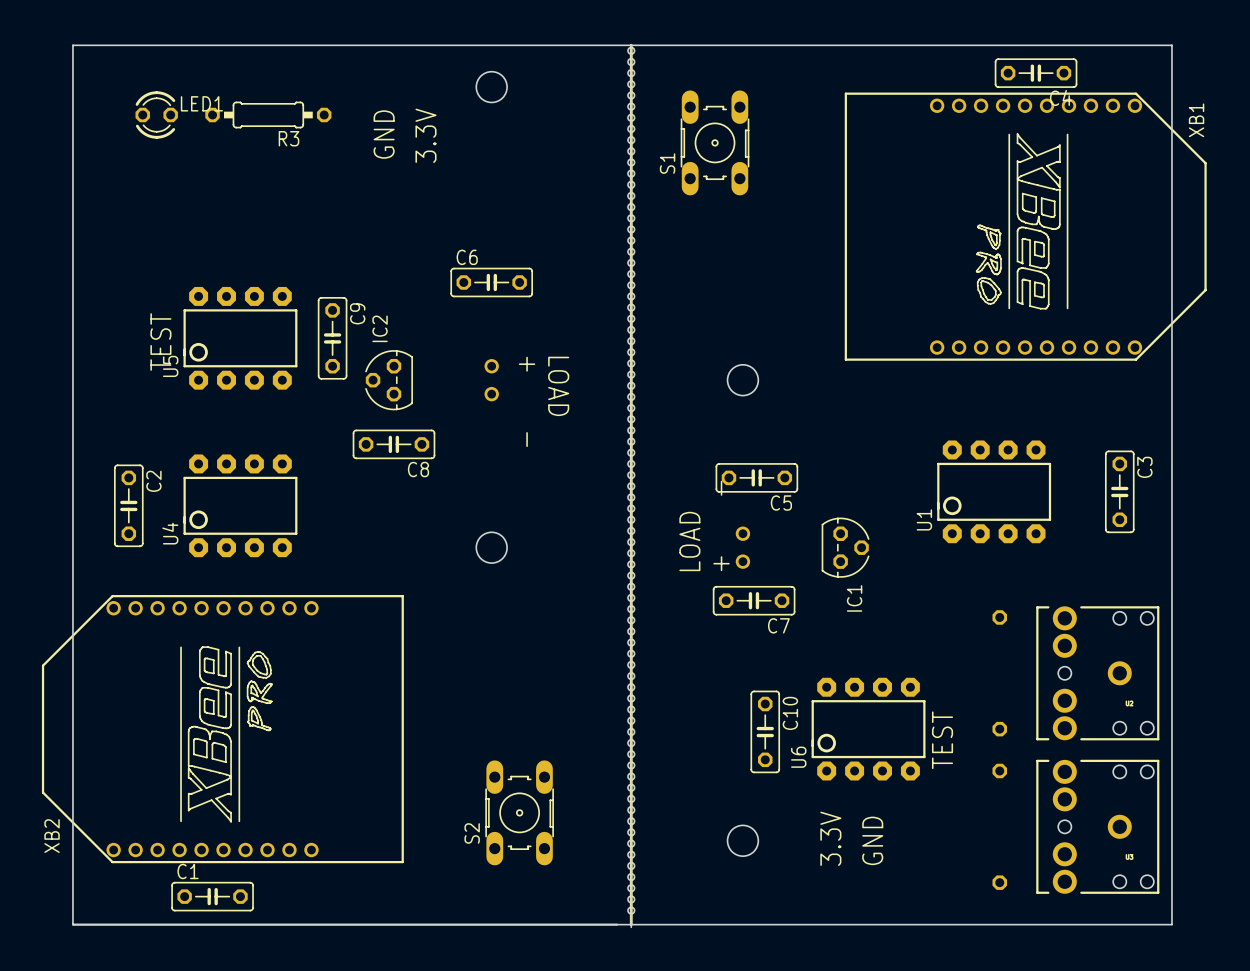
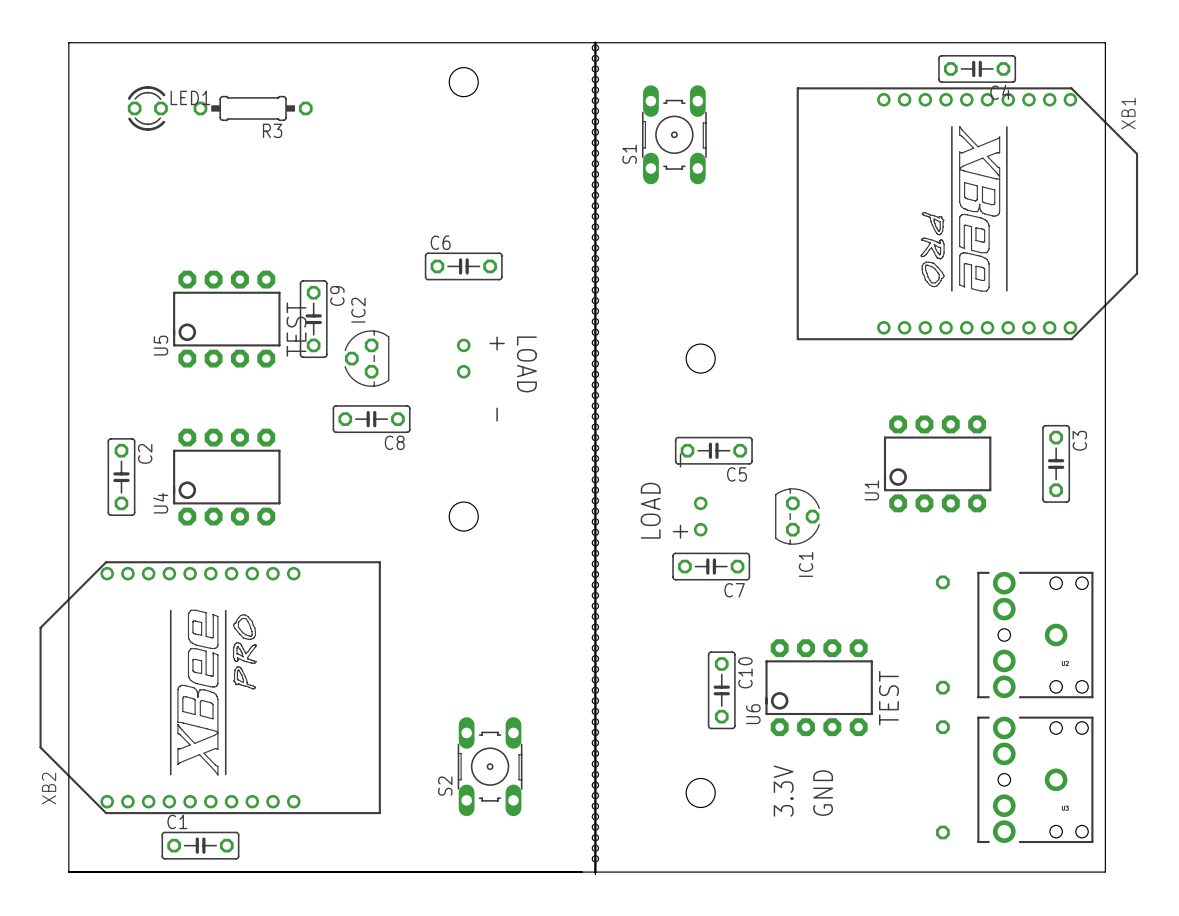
text: GND (384, 134) -> none
text: 3.3V (425, 135) -> none
text position: TEST (160, 341) -> TEST (296, 329)

